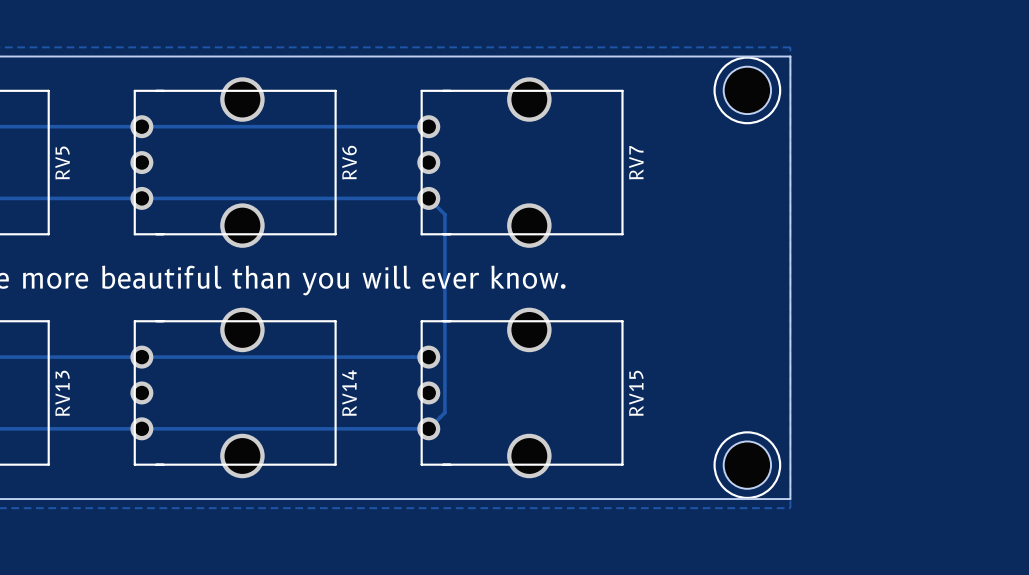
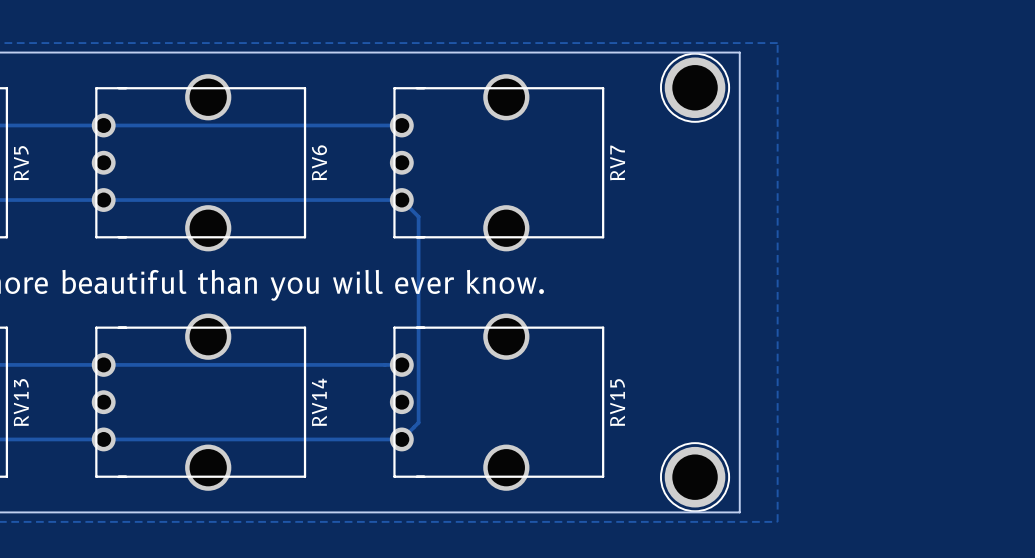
board edge: (753, 56) (790, 56) (790, 499) (753, 499) -> (739, 52) (739, 512)
part: none -> (695, 87)
part: (747, 90) -> none
part: none -> (695, 477)
part: (747, 465) -> none

